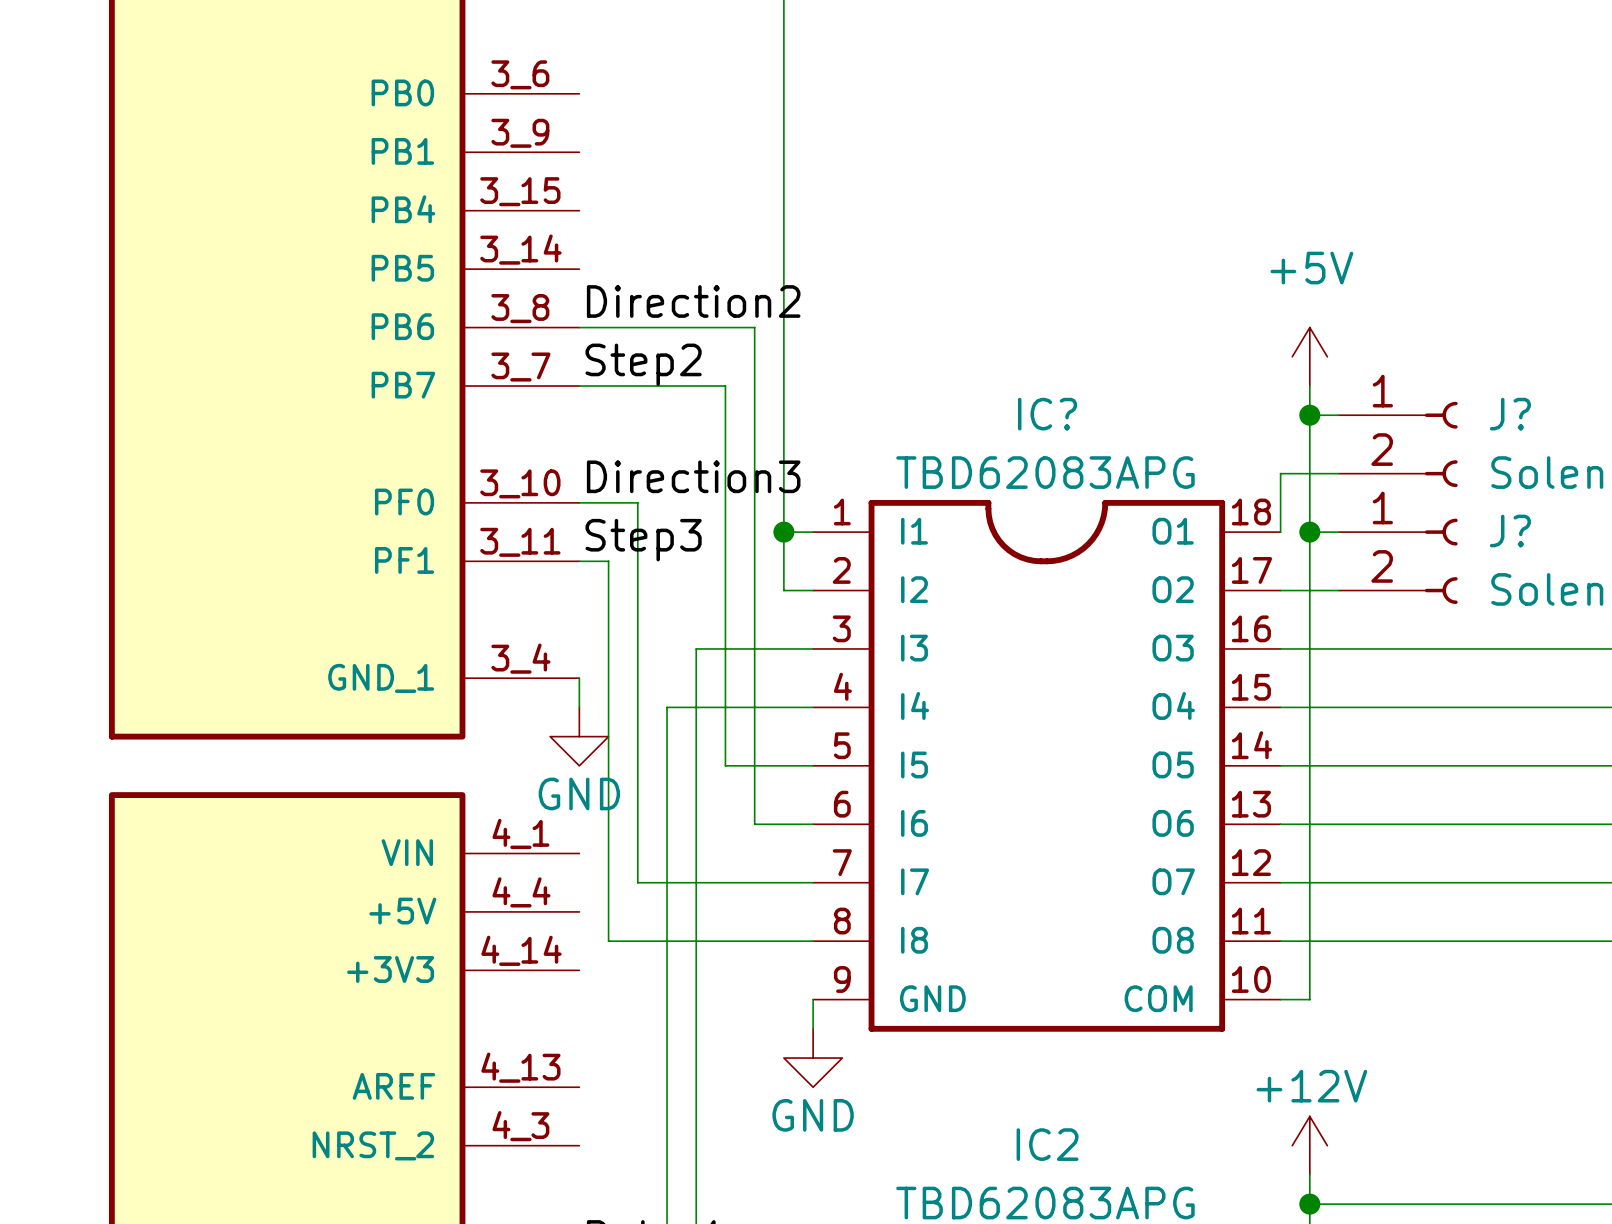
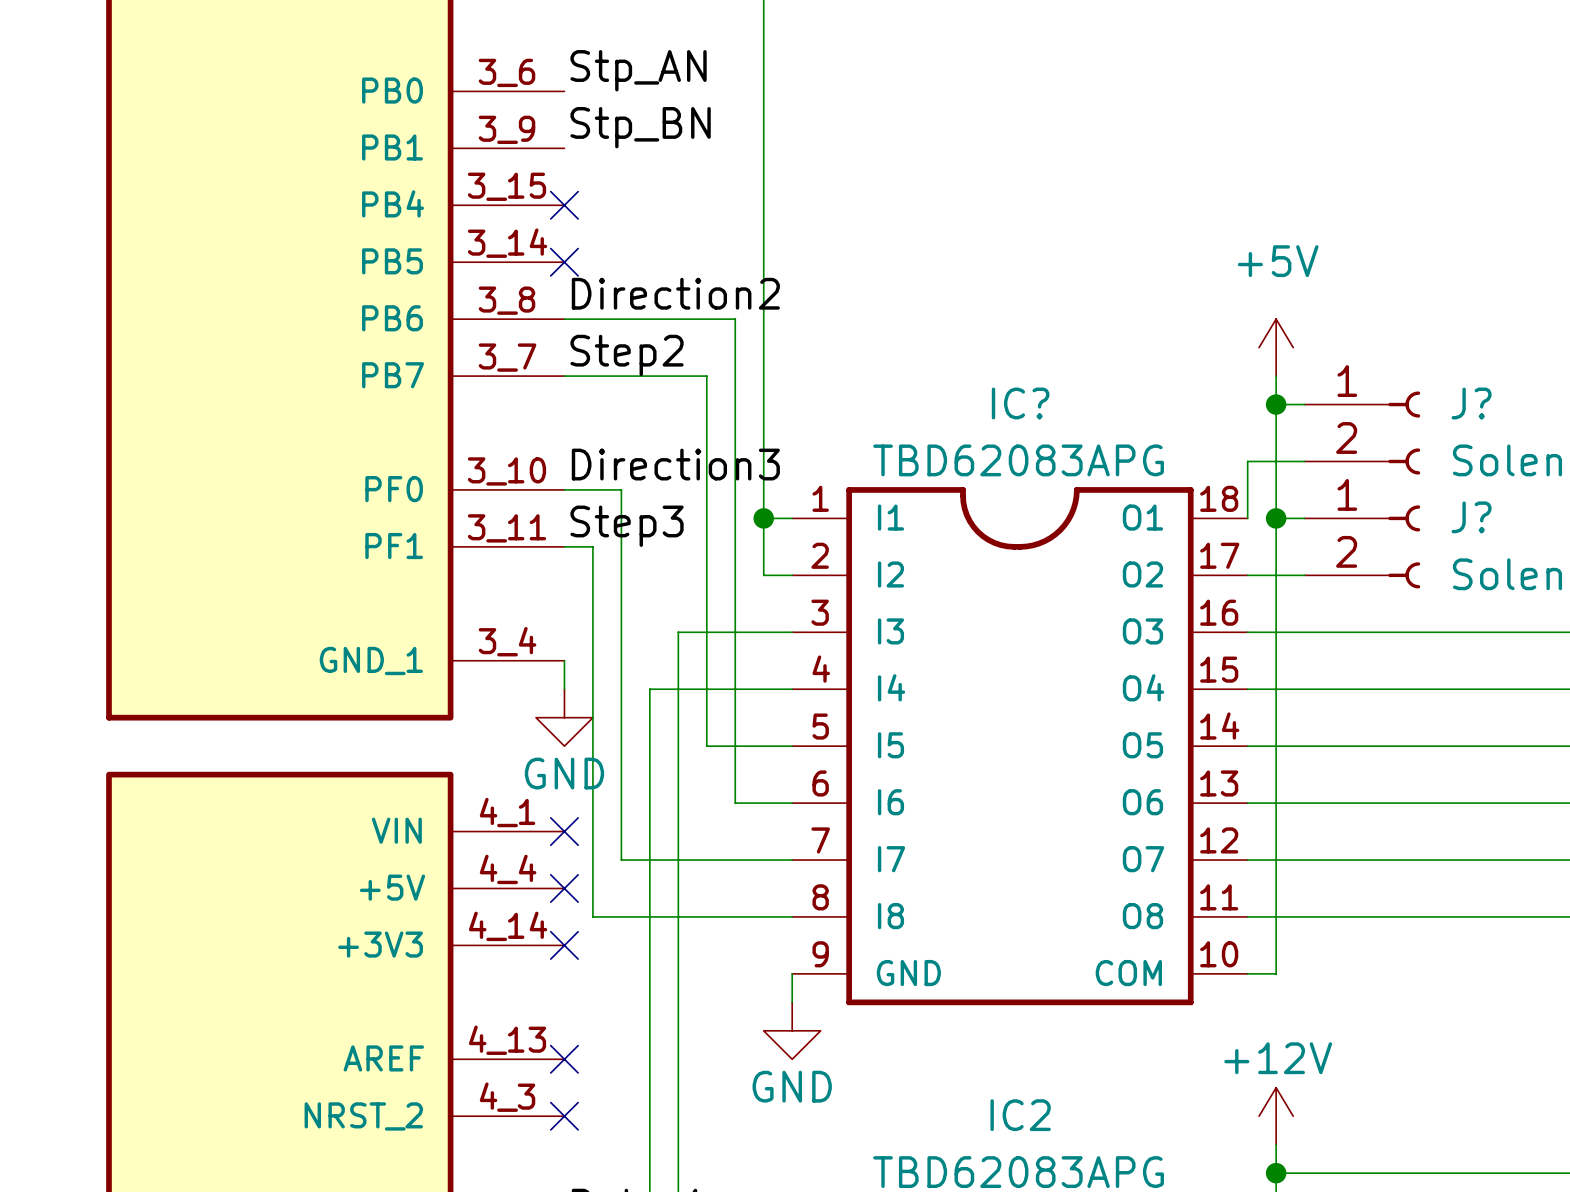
label: none -> Stp_AN (638, 70)
label: none -> Stp_BN (640, 127)
no-connect mark: none -> (564, 205)
no-connect mark: none -> (564, 262)
no-connect mark: none -> (564, 831)
no-connect mark: none -> (564, 888)
no-connect mark: none -> (564, 945)
no-connect mark: none -> (564, 1059)
no-connect mark: none -> (564, 1116)

